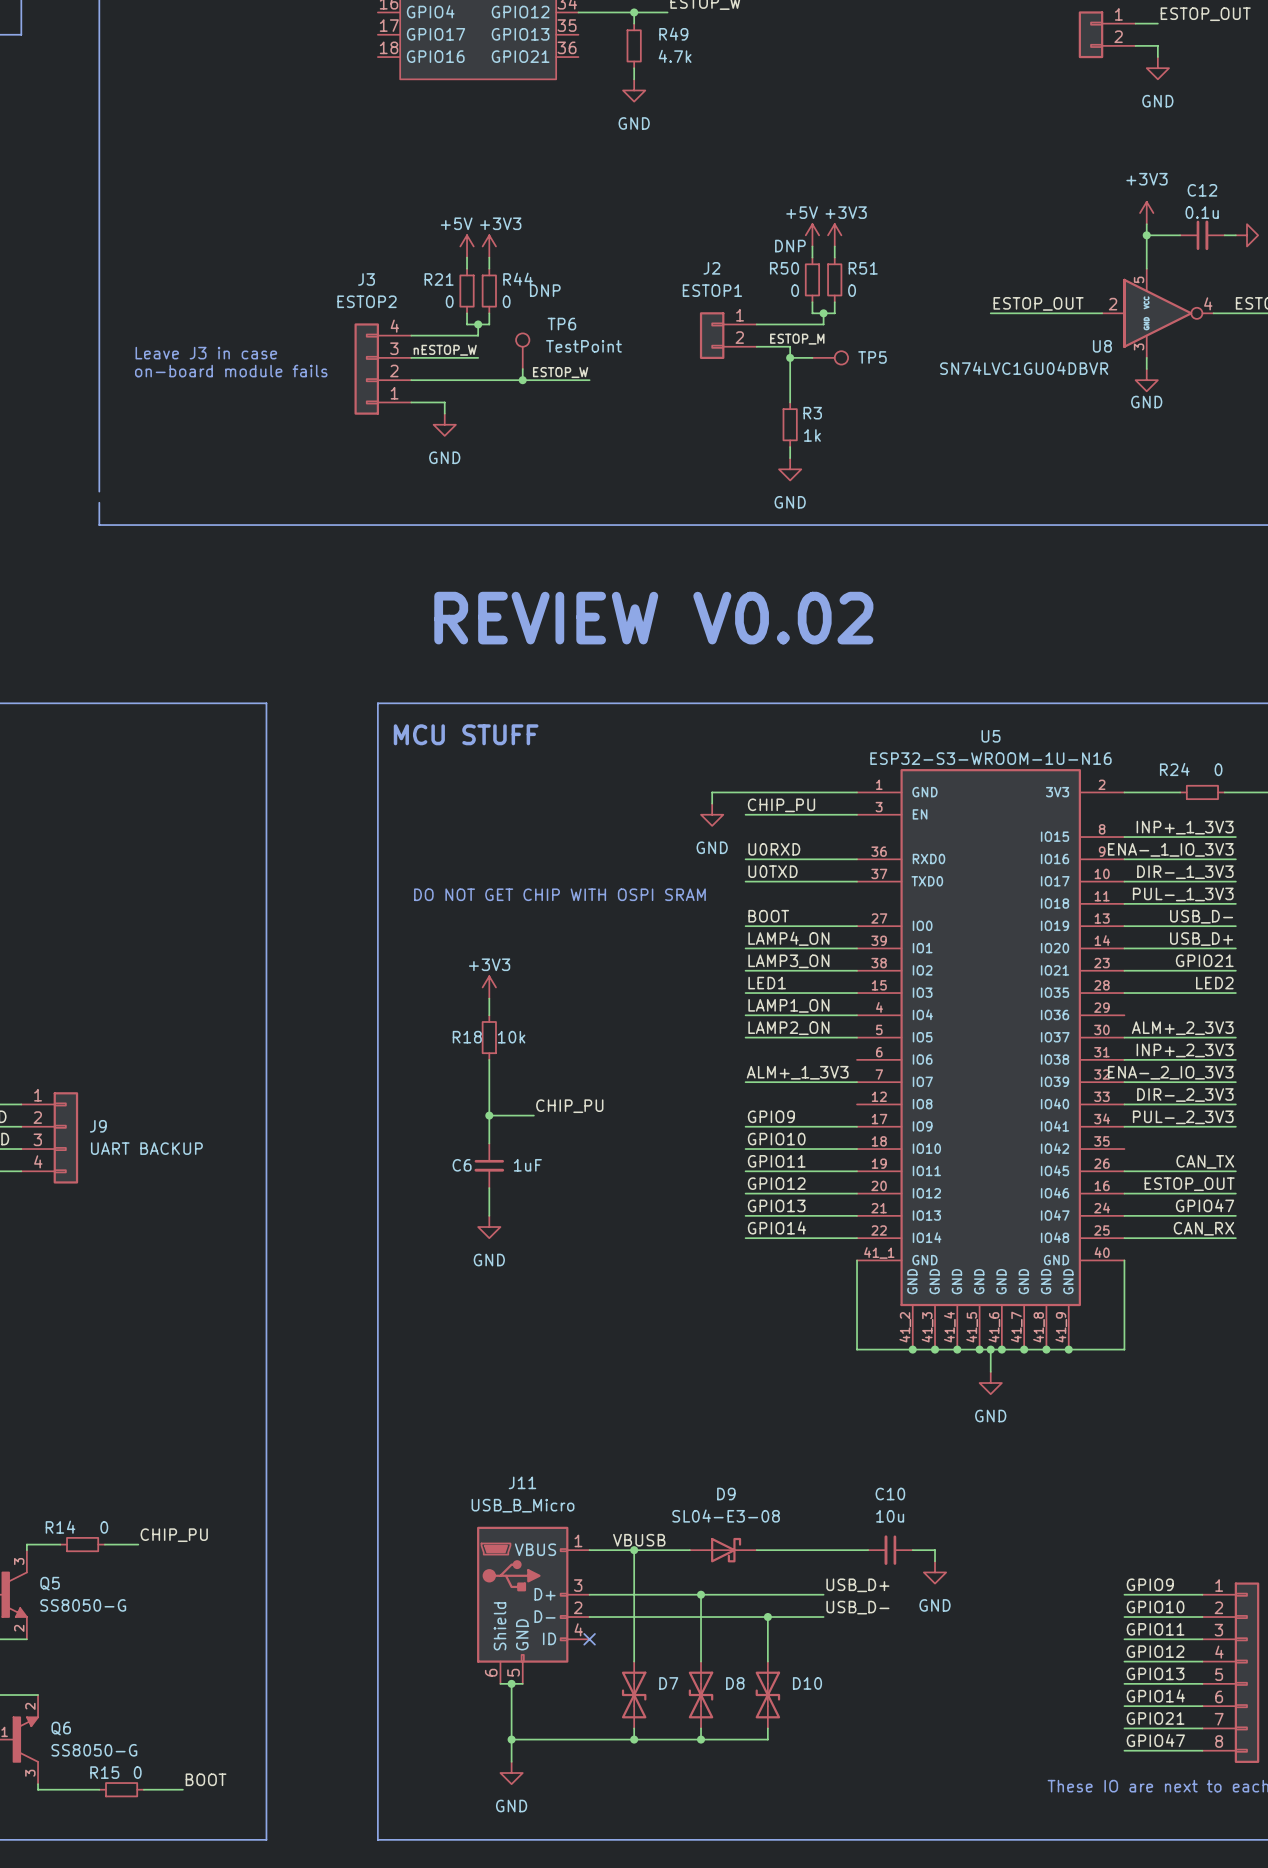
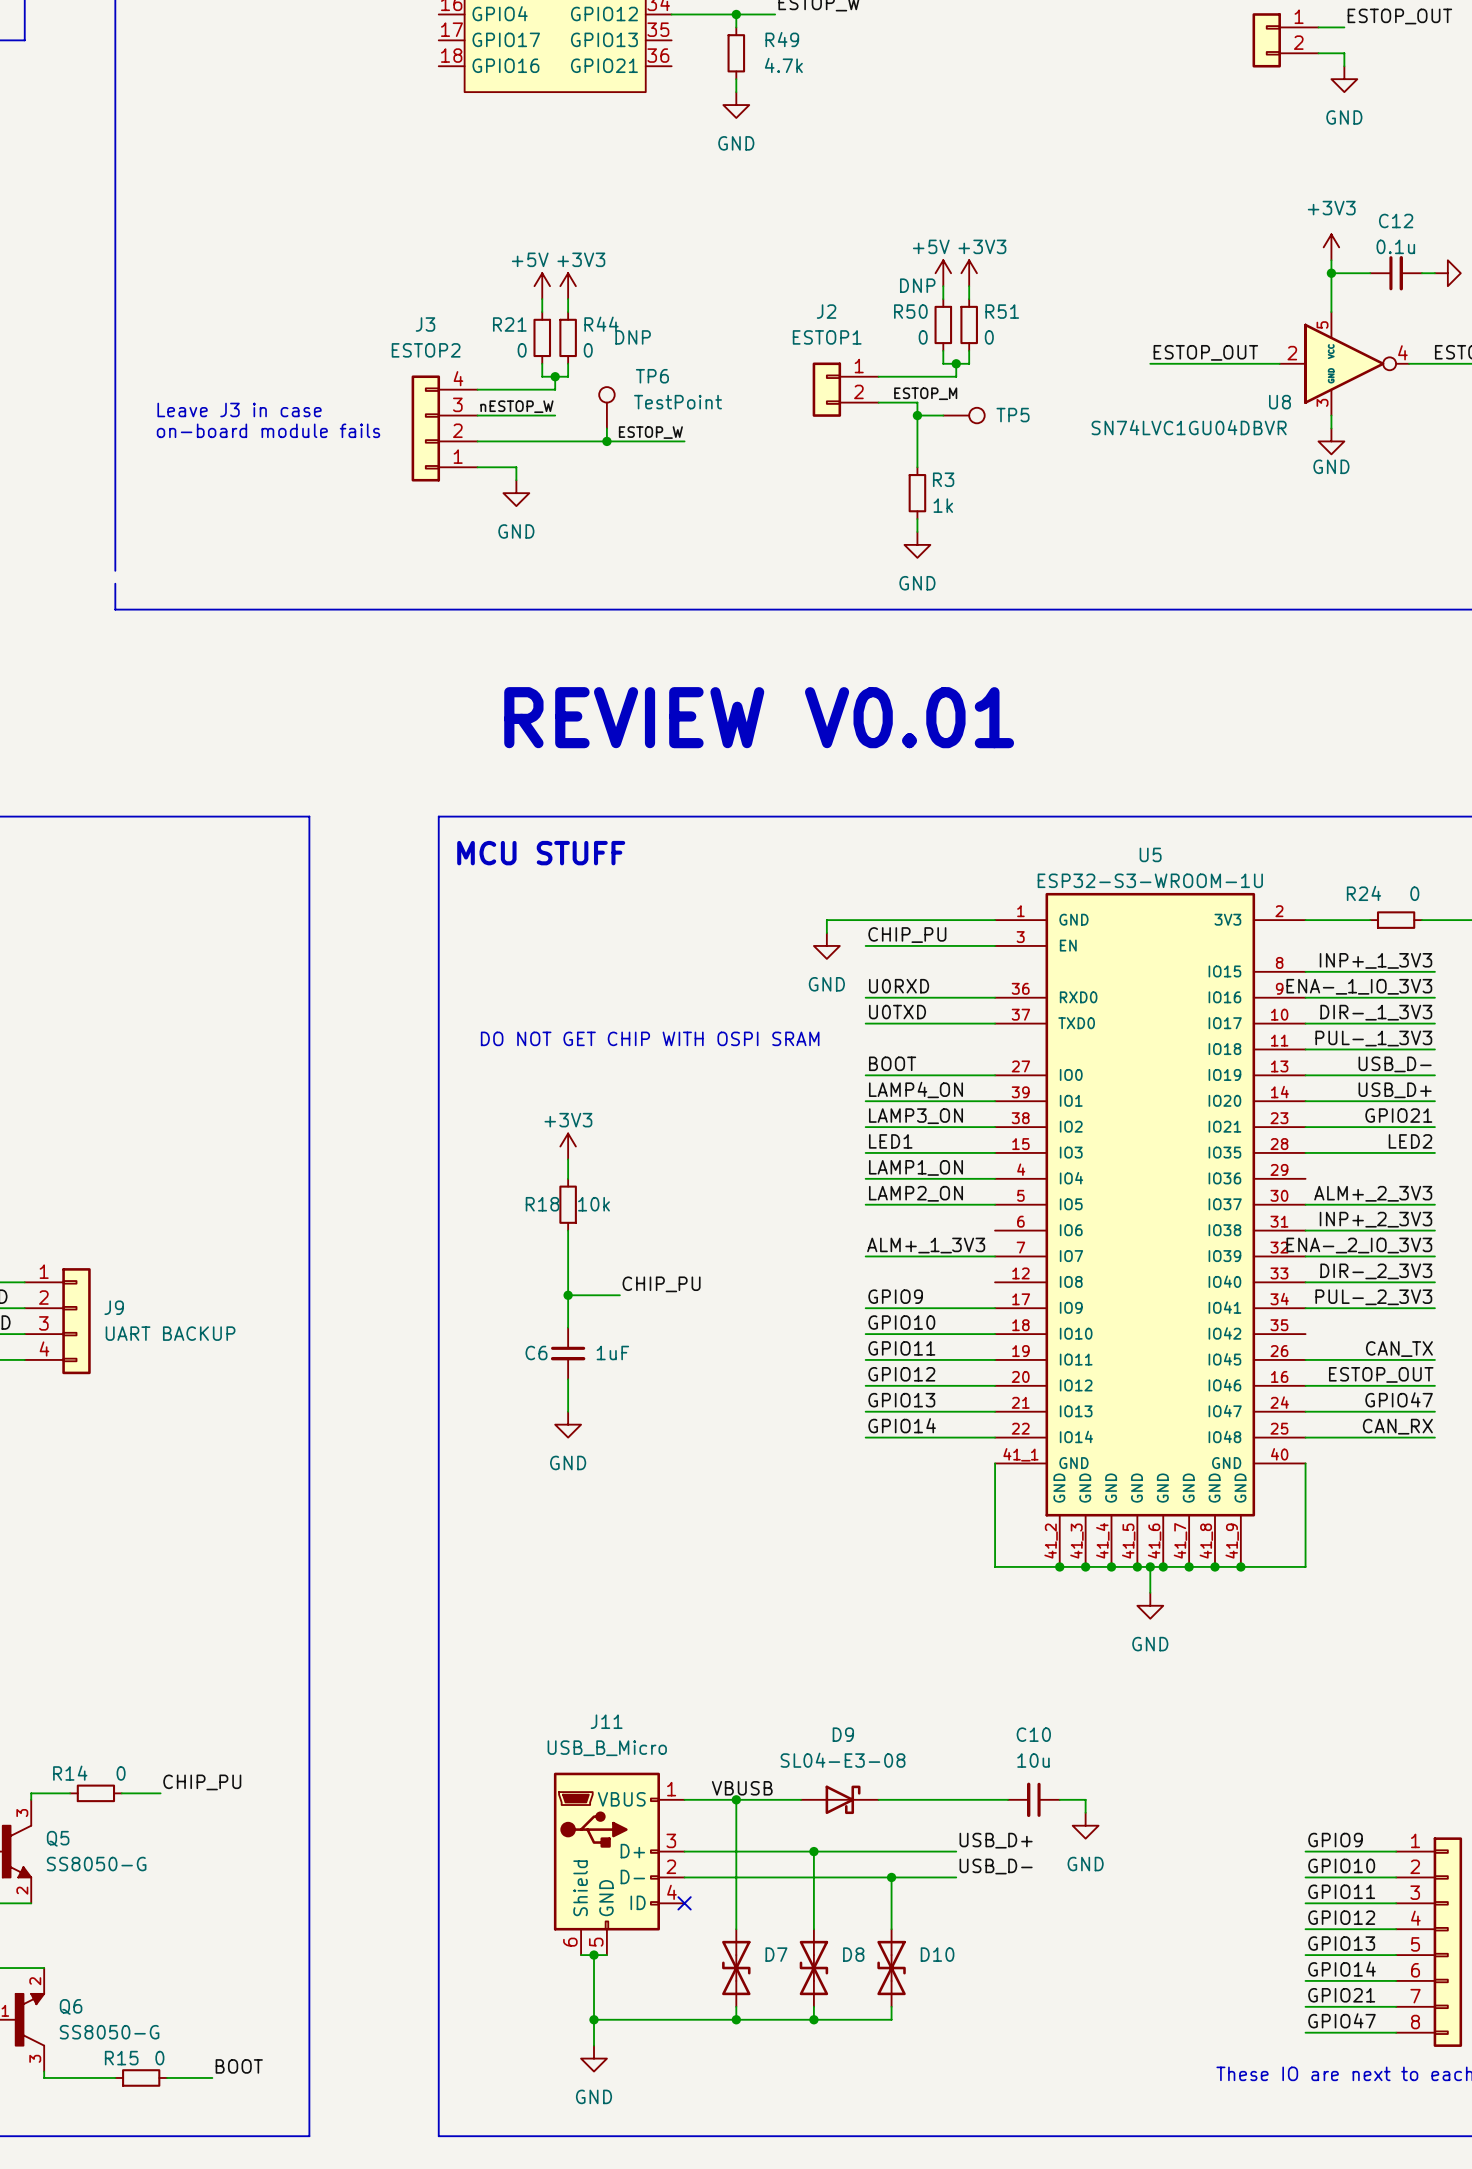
text: REVIEW V0.02 (653, 618) -> REVIEW V0.01 (759, 717)
U5 value: ESP32-S3-WROOM-1U-N16 (990, 758) -> ESP32-S3-WROOM-1U (1150, 880)

